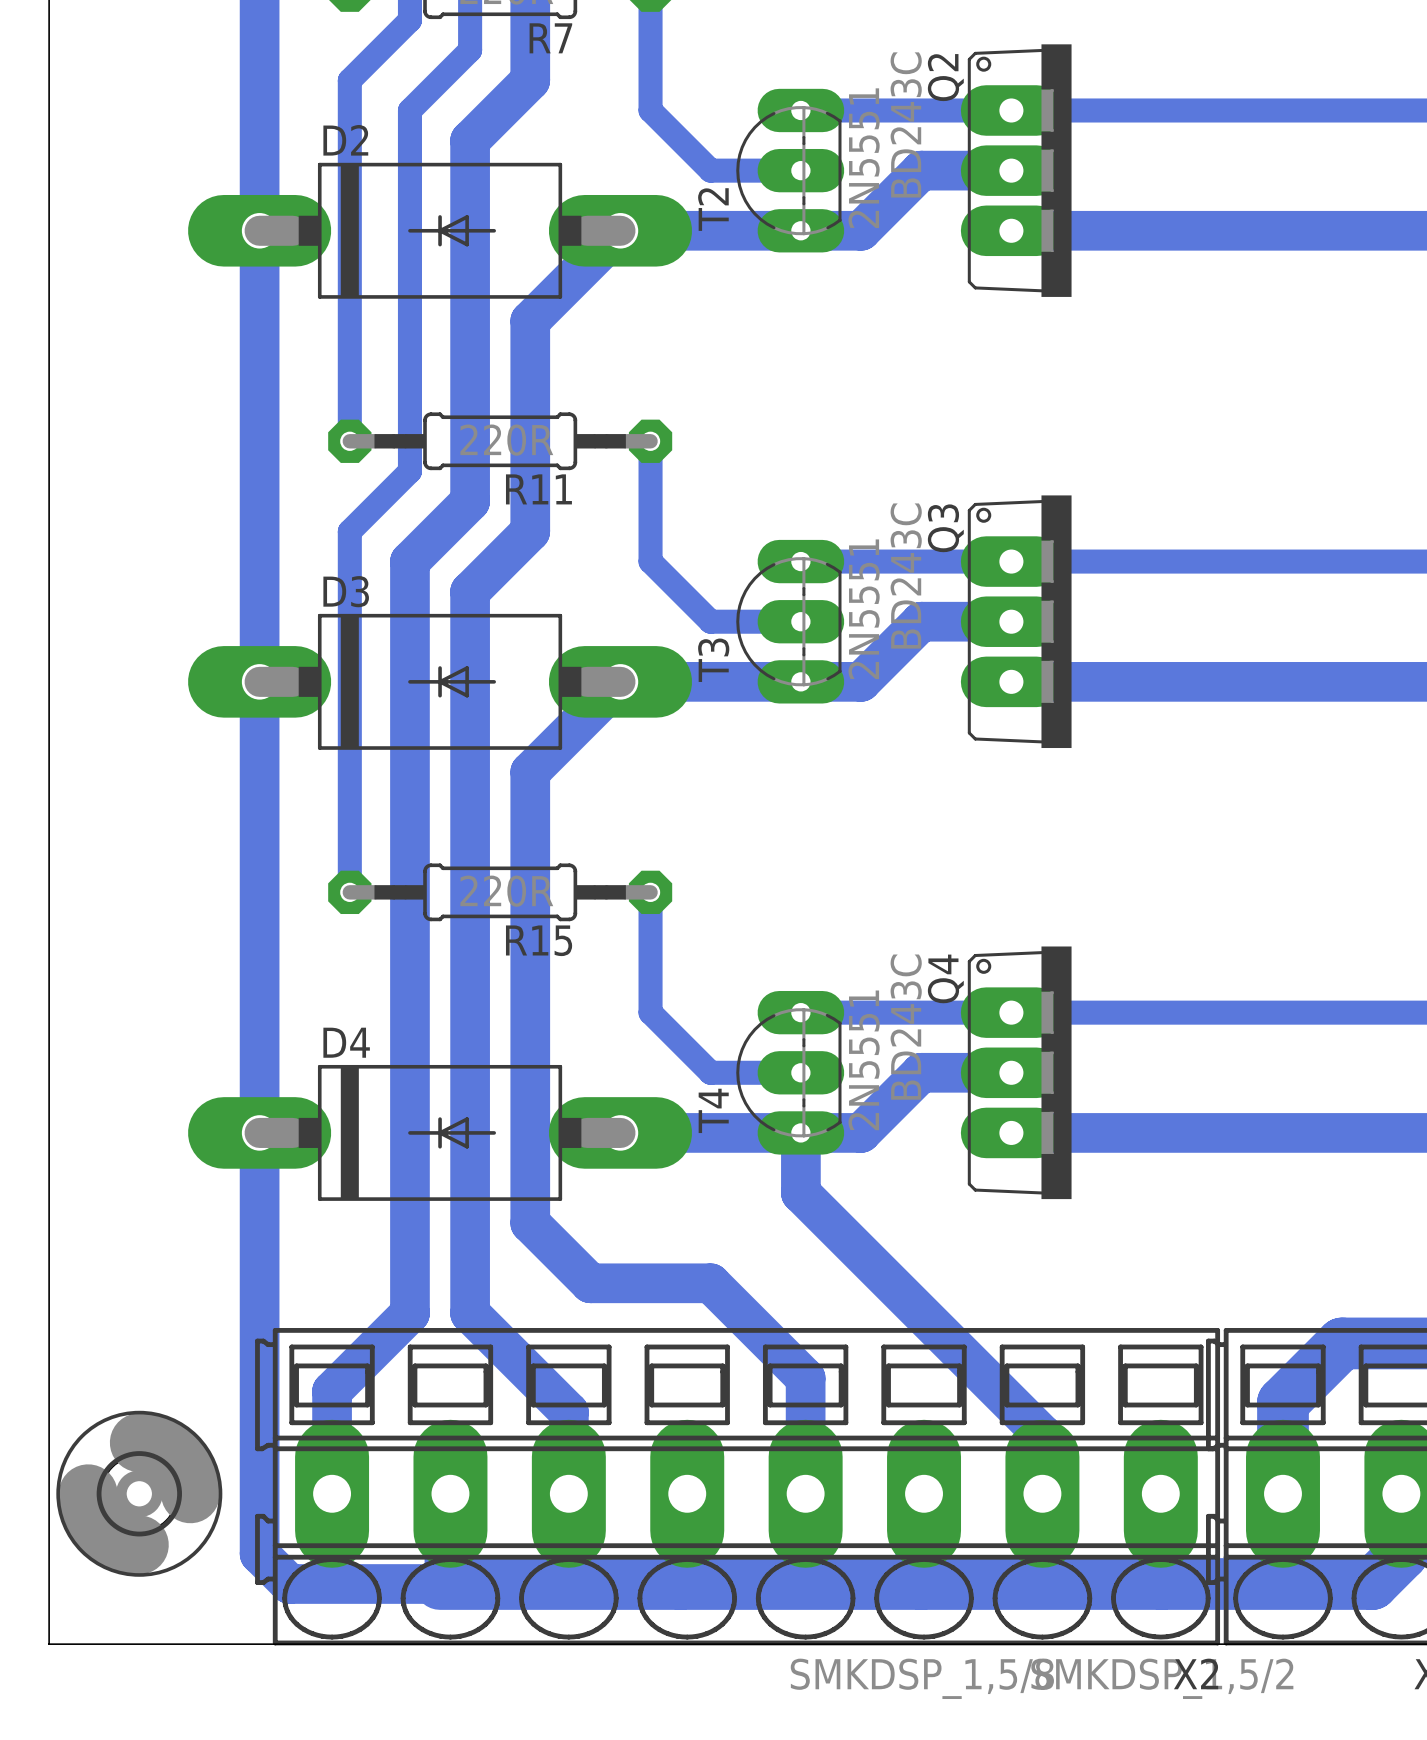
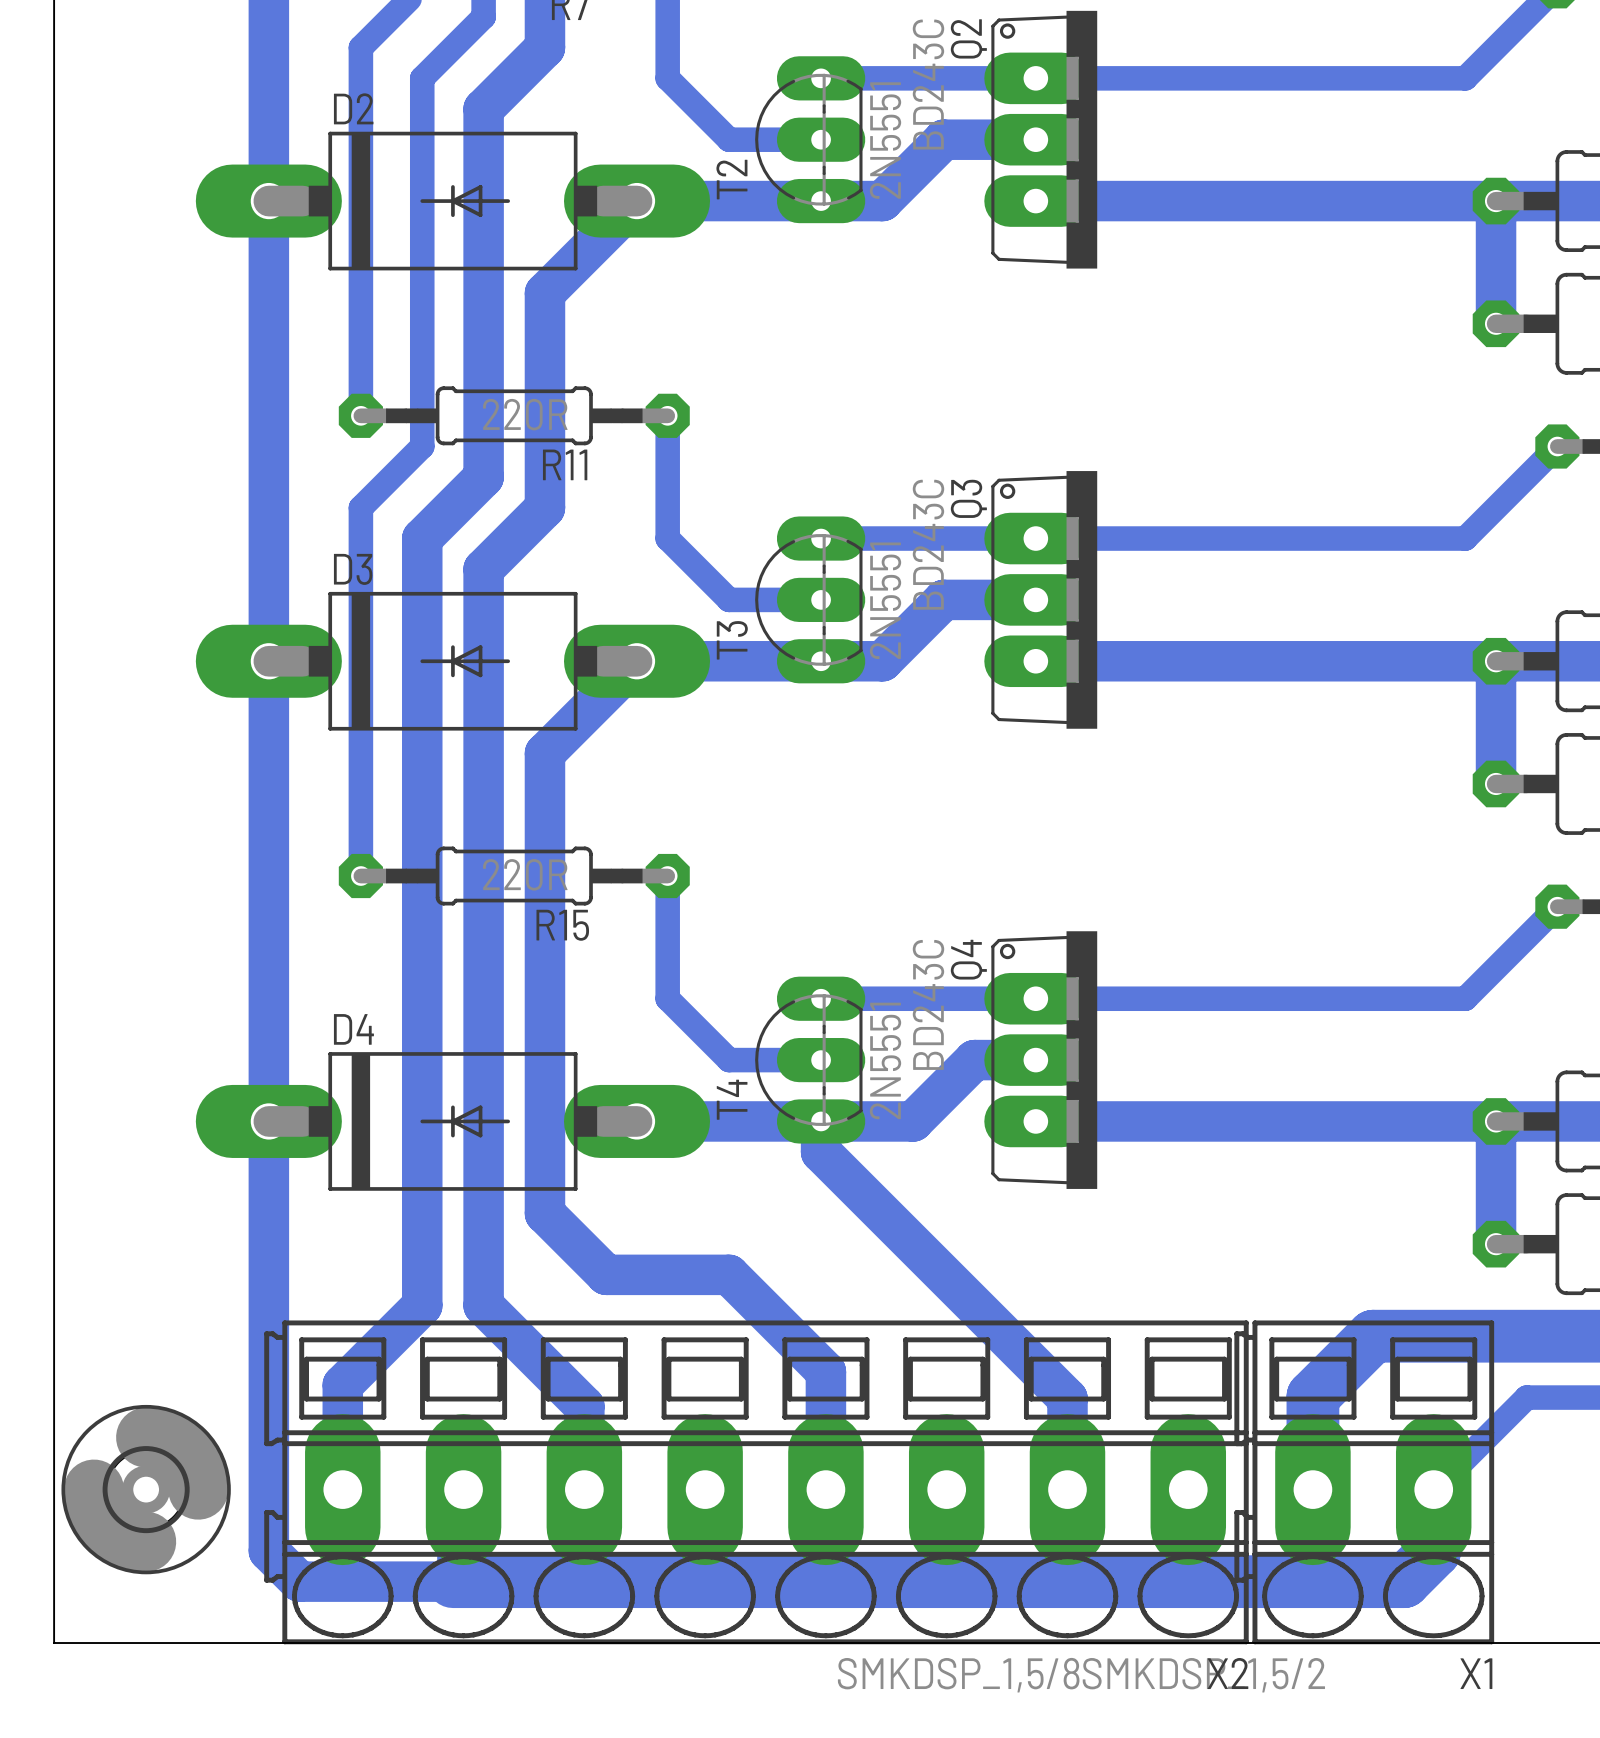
bottom track: (951, 1072) (921, 1072) (861, 1132) -> (974, 1060) (913, 1121) (882, 1121)
bottom track: (800, 1163) (800, 1193) (1042, 1434) -> (821, 1152) (1067, 1398) (1067, 1429)

